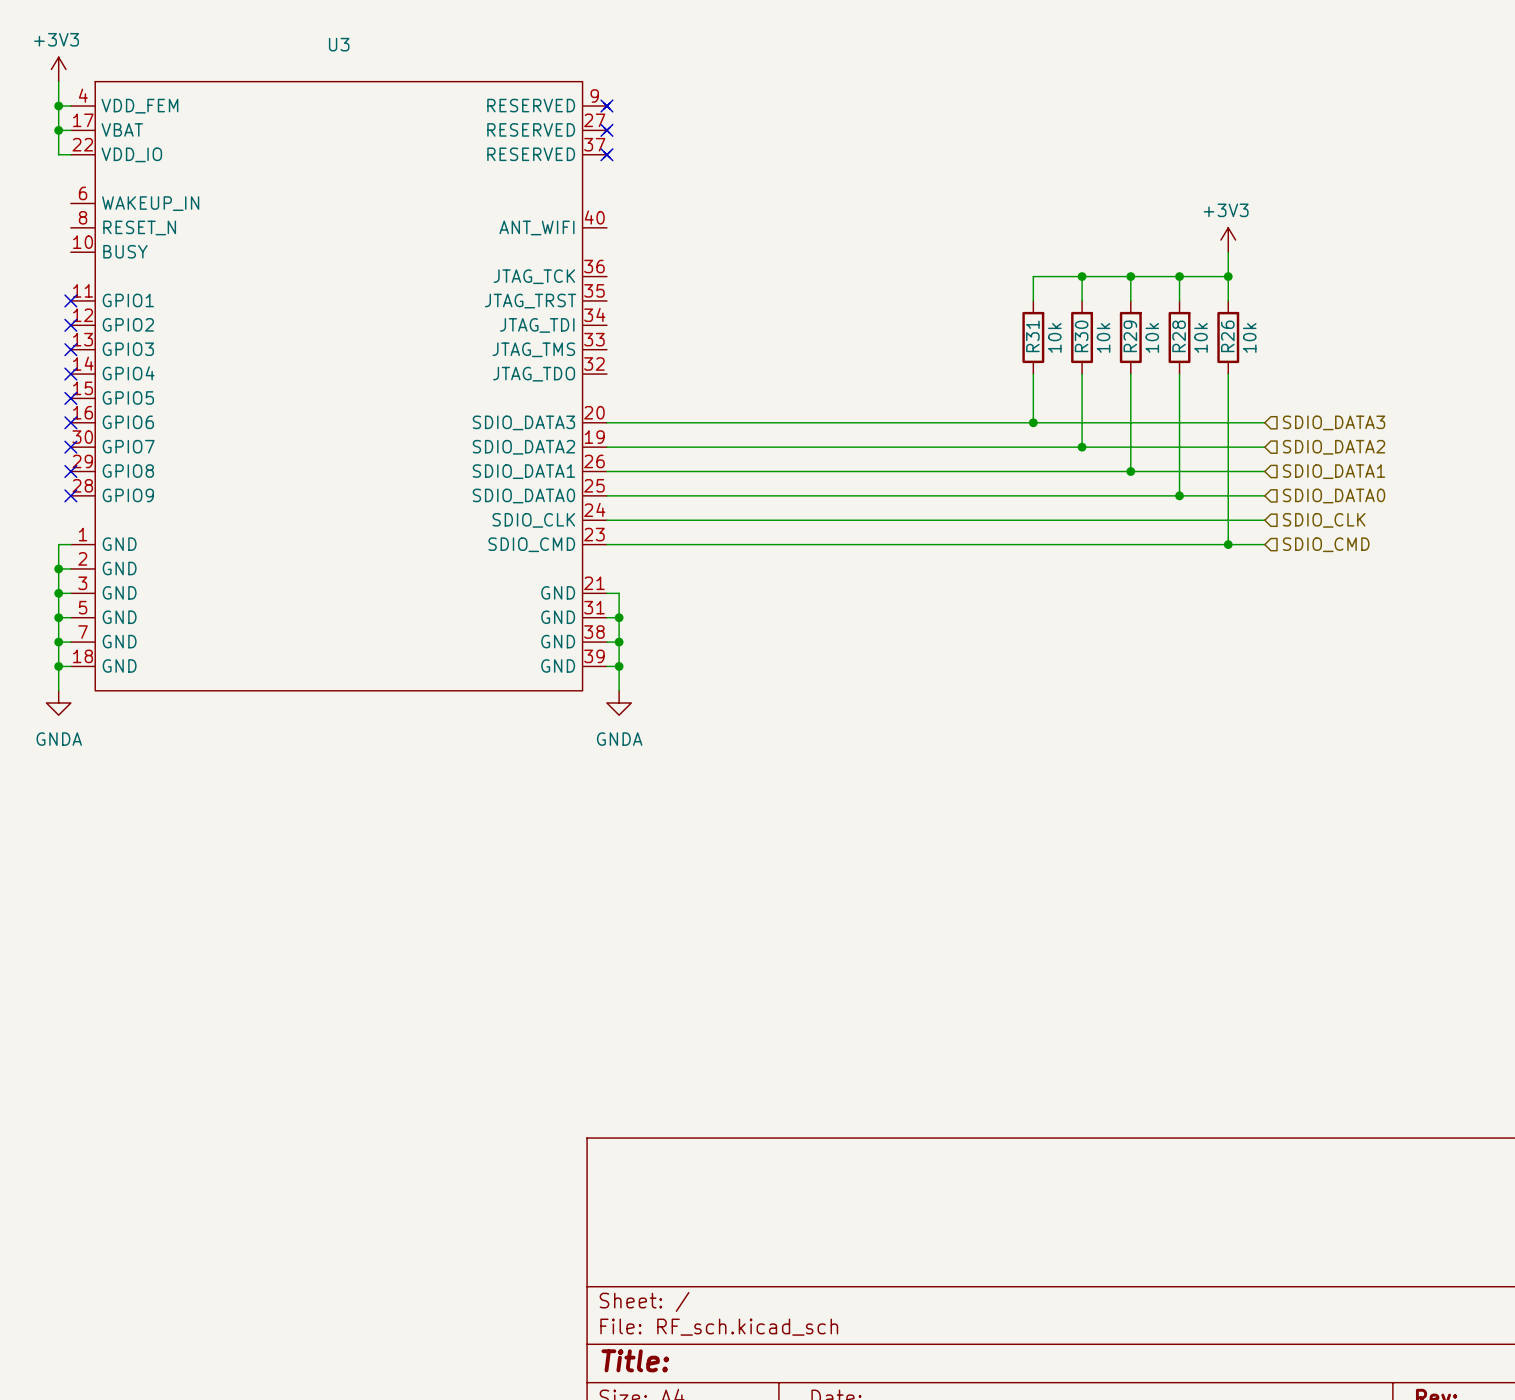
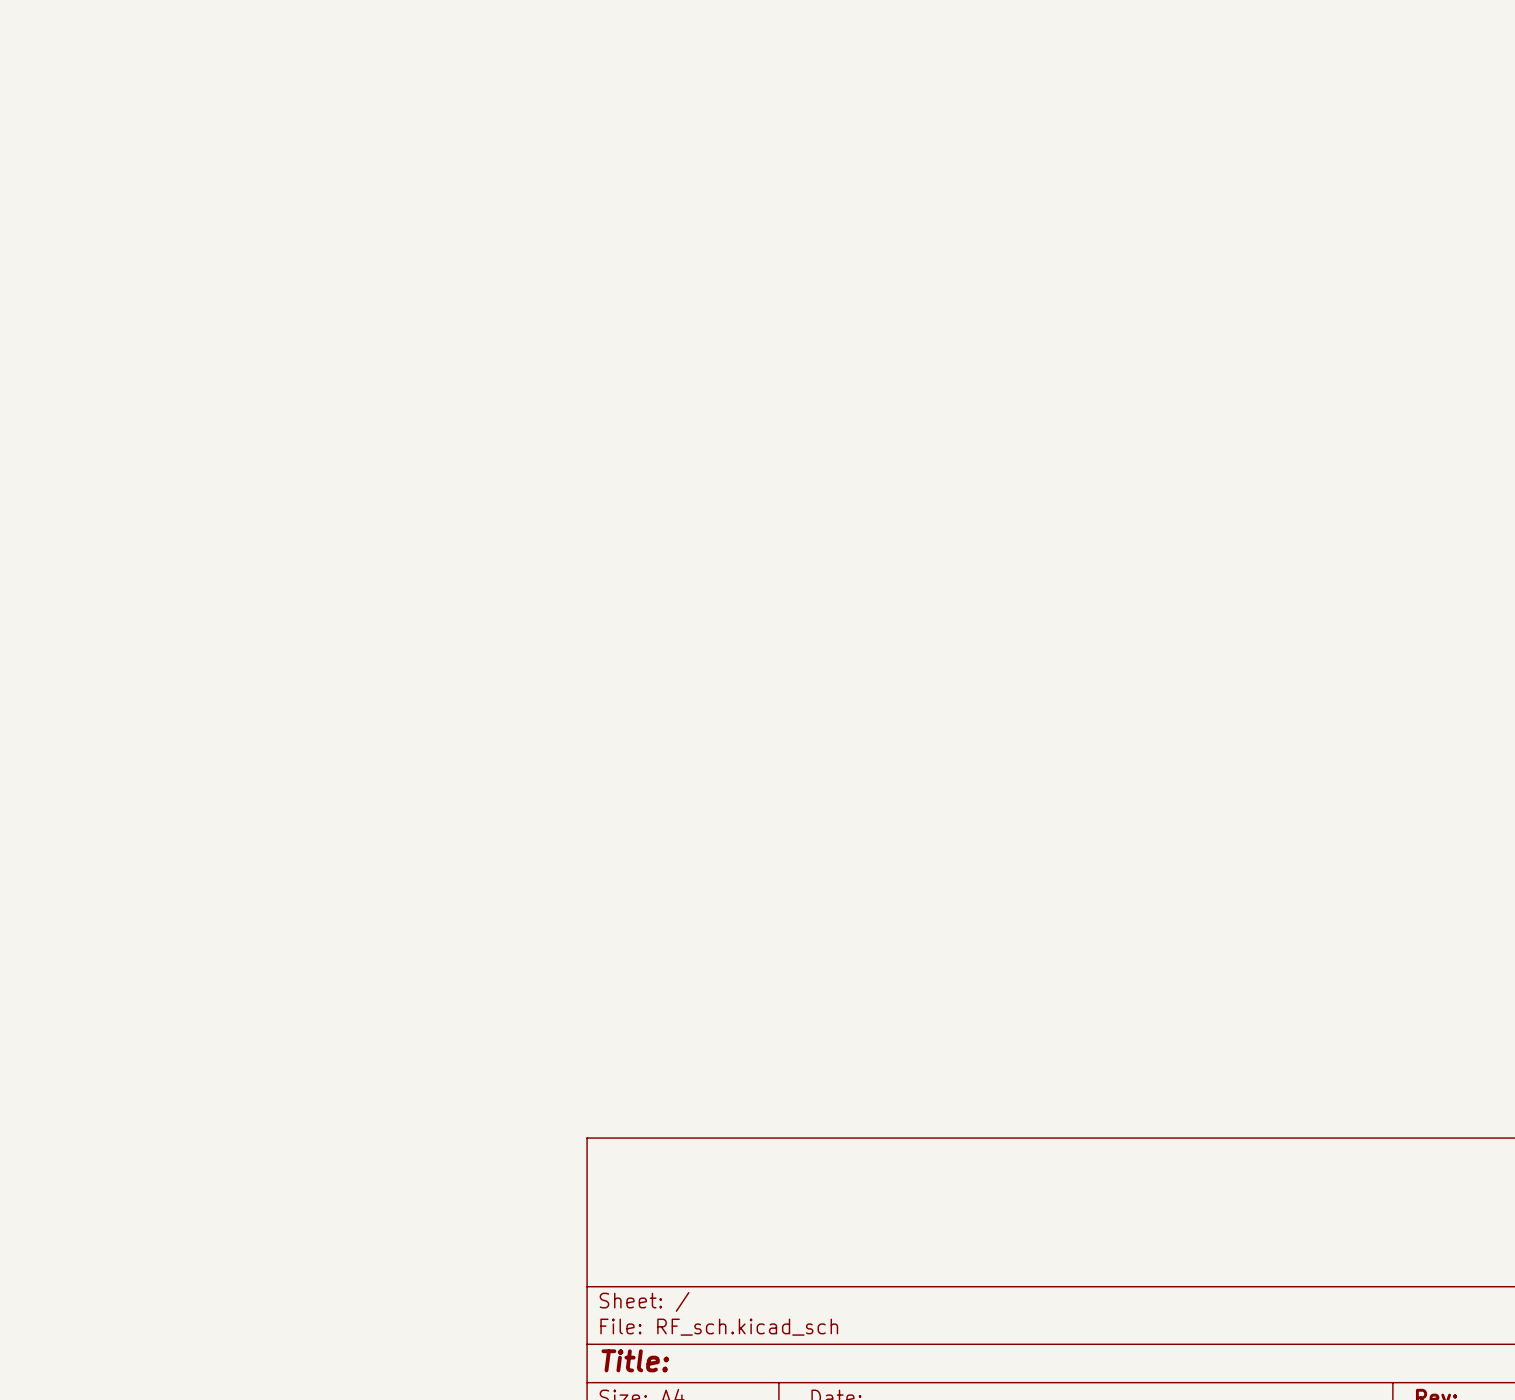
power symbol: +3V3 (58, 69) -> none
wire: (58, 81) (58, 154) (70, 154) -> none
wire: (58, 106) (70, 106) -> none
junction: (58, 106) -> none
no-connect mark: (606, 106) -> none
wire: (58, 130) (70, 130) -> none
junction: (58, 130) -> none
no-connect mark: (606, 130) -> none
no-connect mark: (606, 154) -> none
power symbol: +3V3 (1228, 240) -> none
wire: (1228, 252) (1228, 300) -> none
wire: (1082, 276) (1082, 300) -> none
junction: (1082, 276) -> none
wire: (1130, 276) (1130, 300) -> none
junction: (1130, 276) -> none
wire: (1179, 276) (1179, 300) -> none
junction: (1179, 276) -> none
wire: (1228, 276) (1033, 276) (1033, 300) -> none
junction: (1228, 276) -> none
no-connect mark: (70, 300) -> none
no-connect mark: (70, 325) -> none
R31: 10k (1033, 337) -> none
R30: 10k (1082, 337) -> none
R29: 10k (1130, 337) -> none
R28: 10k (1179, 337) -> none
R26: 10k (1228, 337) -> none
no-connect mark: (70, 349) -> none
no-connect mark: (70, 374) -> none
wire: (1033, 374) (1033, 422) -> none
wire: (1082, 374) (1082, 447) -> none
wire: (1130, 374) (1130, 471) -> none
wire: (1179, 374) (1179, 495) -> none
wire: (1228, 374) (1228, 544) -> none
U3: (340, 386) -> none
no-connect mark: (70, 398) -> none
no-connect mark: (70, 422) -> none
wire: (606, 422) (1264, 422) -> none
junction: (1033, 422) -> none
hierarchical label: SDIO_DATA3 (1334, 422) -> none
no-connect mark: (70, 447) -> none
wire: (606, 447) (1264, 447) -> none
junction: (1082, 447) -> none
hierarchical label: SDIO_DATA2 (1334, 447) -> none
no-connect mark: (70, 471) -> none
wire: (606, 471) (1264, 471) -> none
junction: (1130, 471) -> none
hierarchical label: SDIO_DATA1 (1334, 471) -> none
no-connect mark: (70, 495) -> none
wire: (606, 495) (1264, 495) -> none
junction: (1179, 495) -> none
hierarchical label: SDIO_DATA0 (1334, 496) -> none
wire: (606, 520) (1264, 520) -> none
hierarchical label: SDIO_CLK (1324, 520) -> none
wire: (70, 544) (58, 544) (58, 690) -> none
wire: (606, 544) (1264, 544) -> none
junction: (1228, 544) -> none
hierarchical label: SDIO_CMD (1326, 544) -> none
wire: (58, 568) (70, 568) -> none
junction: (58, 568) -> none
wire: (58, 593) (70, 593) -> none
junction: (58, 593) -> none
wire: (606, 593) (619, 593) (619, 690) -> none
wire: (58, 617) (70, 617) -> none
junction: (58, 617) -> none
wire: (606, 617) (619, 617) -> none
junction: (619, 617) -> none
wire: (58, 642) (70, 642) -> none
junction: (58, 642) -> none
wire: (606, 642) (619, 642) -> none
junction: (619, 642) -> none
wire: (58, 666) (70, 666) -> none
junction: (58, 666) -> none
wire: (606, 666) (619, 666) -> none
junction: (619, 666) -> none
power symbol: GNDA (58, 702) -> none
power symbol: GNDA (619, 702) -> none

